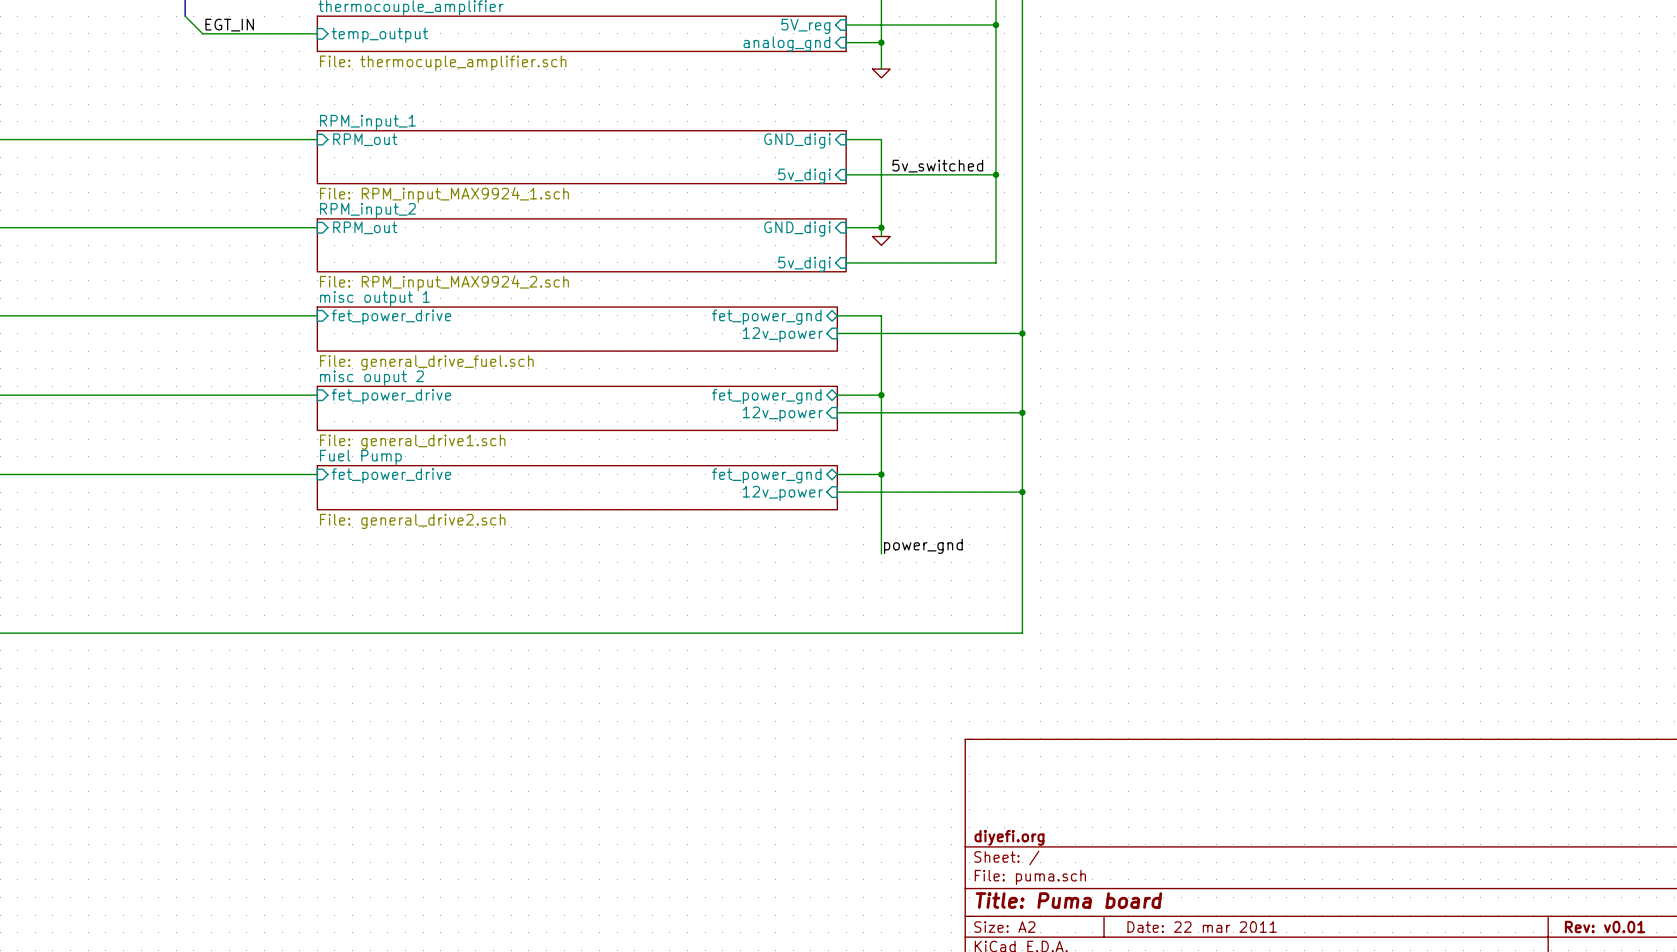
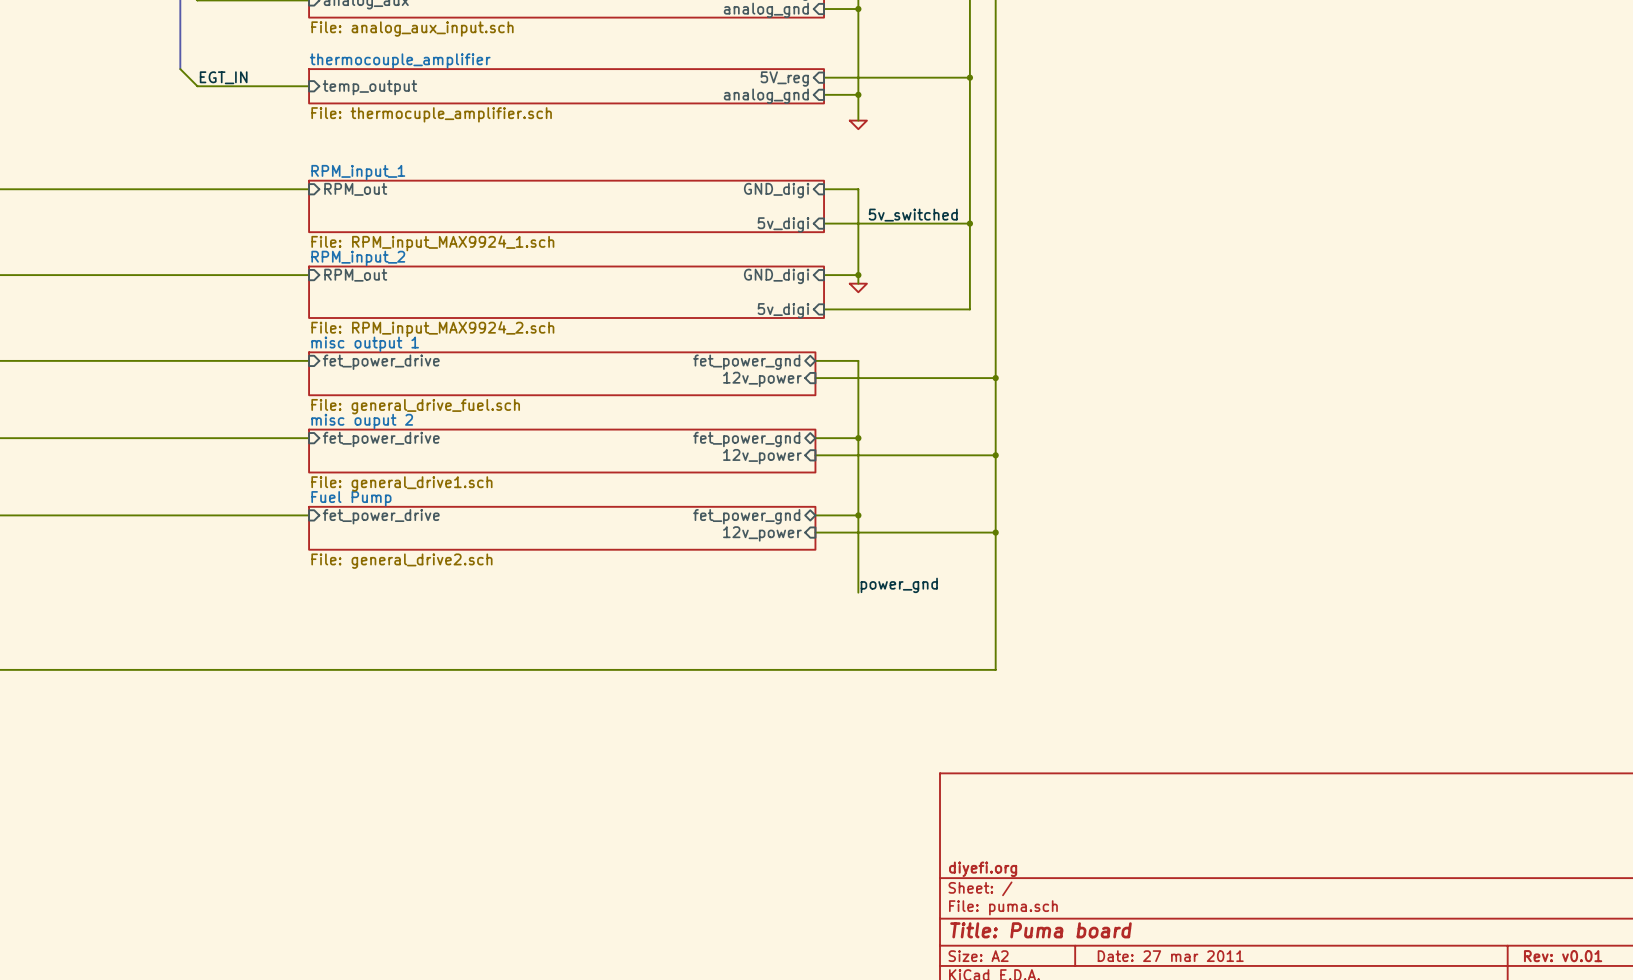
title block: Date: 22 mar 2011 (1202, 927) -> Date: 27 mar 2011 (1170, 956)

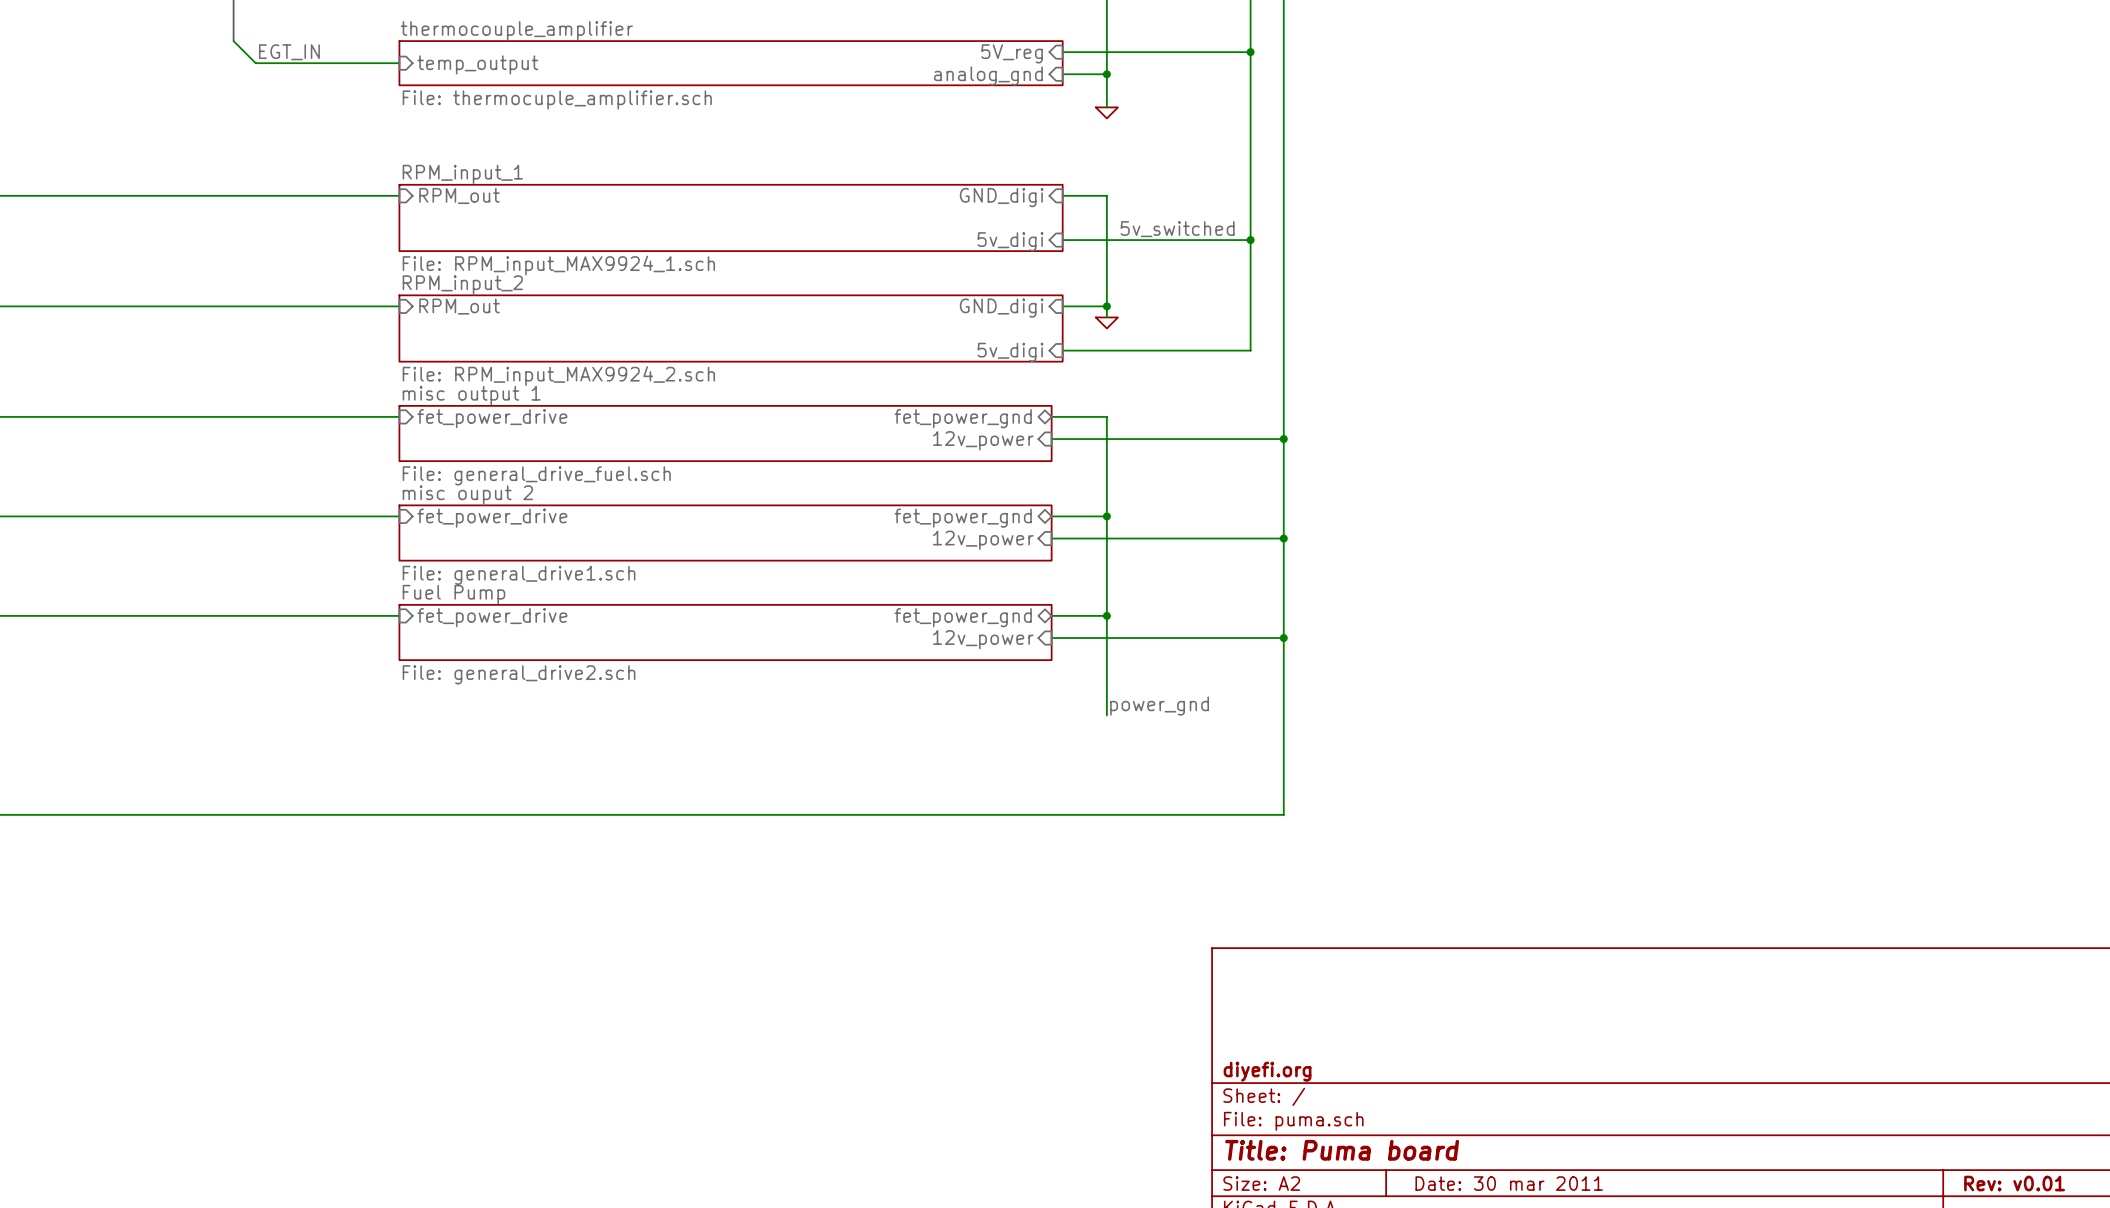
title block: Date: 27 mar 2011 (1170, 956) -> Date: 30 mar 2011 (1509, 1183)

